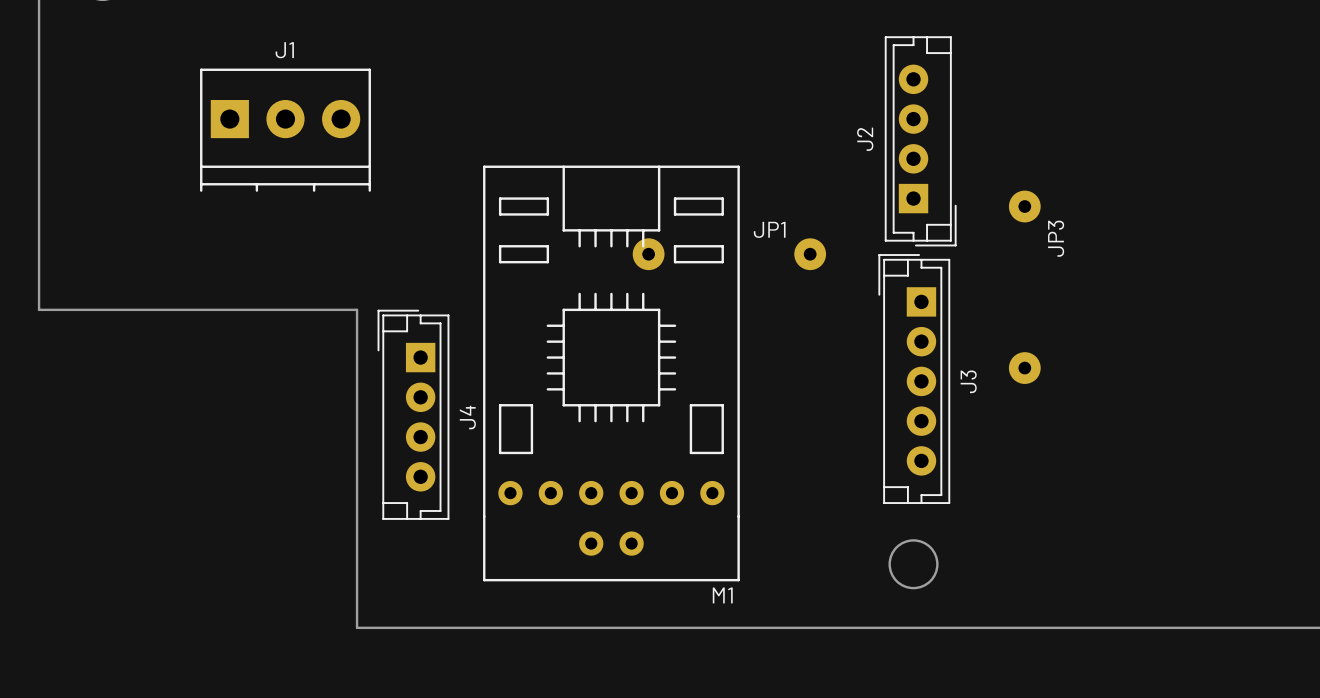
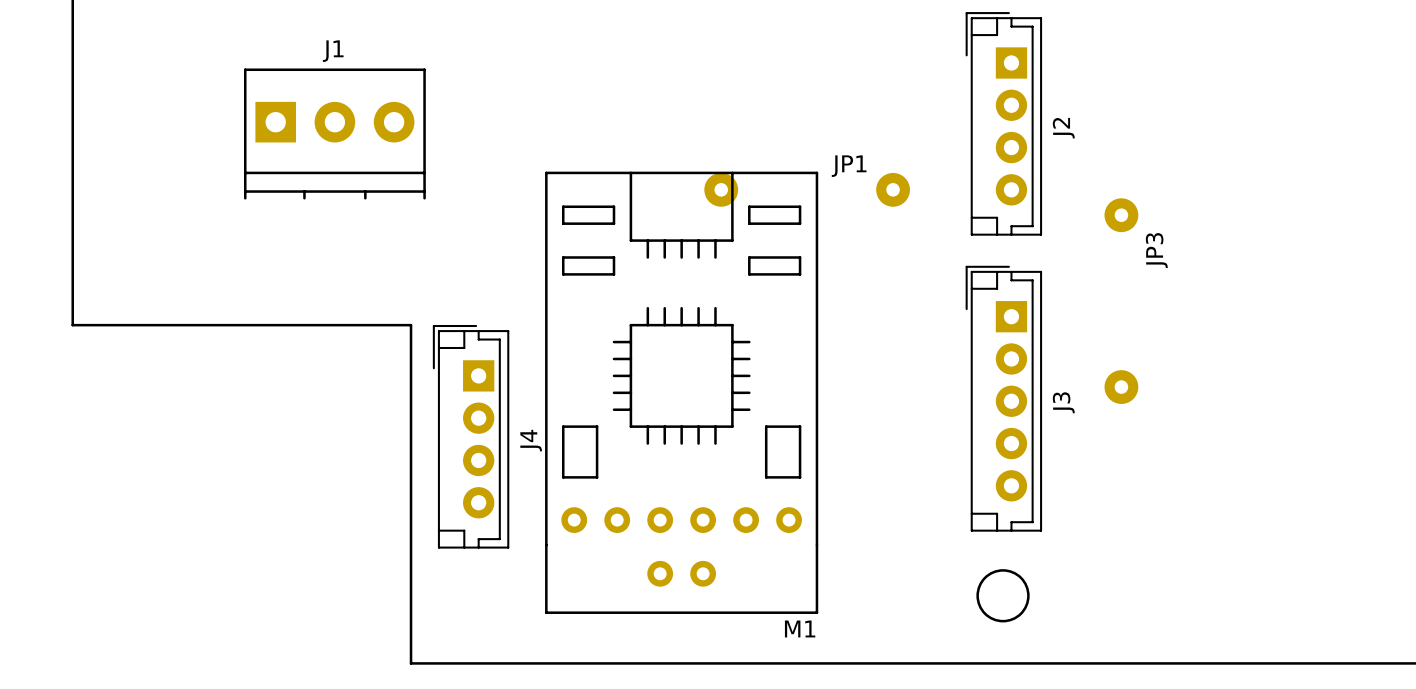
J2 rotation: 0° (920, 141) -> 180° (1003, 123)
JP1 position: (729, 254) -> (807, 189)

